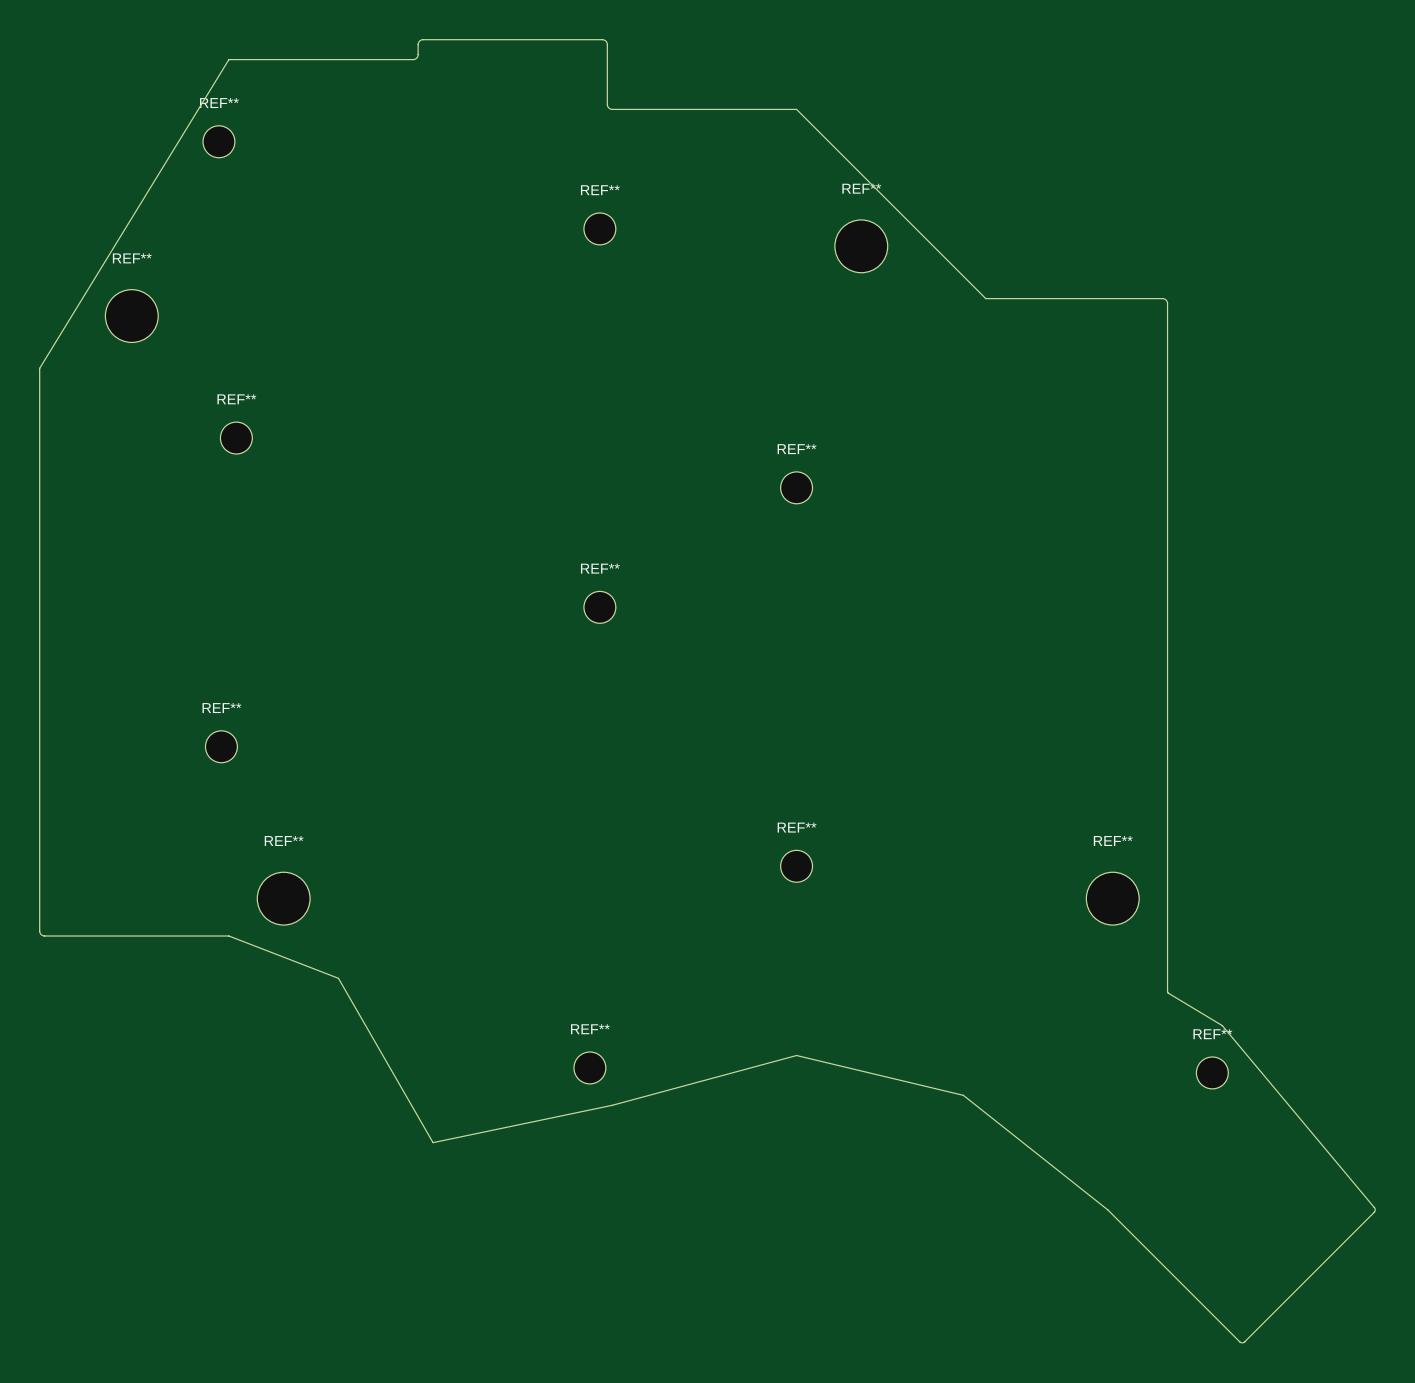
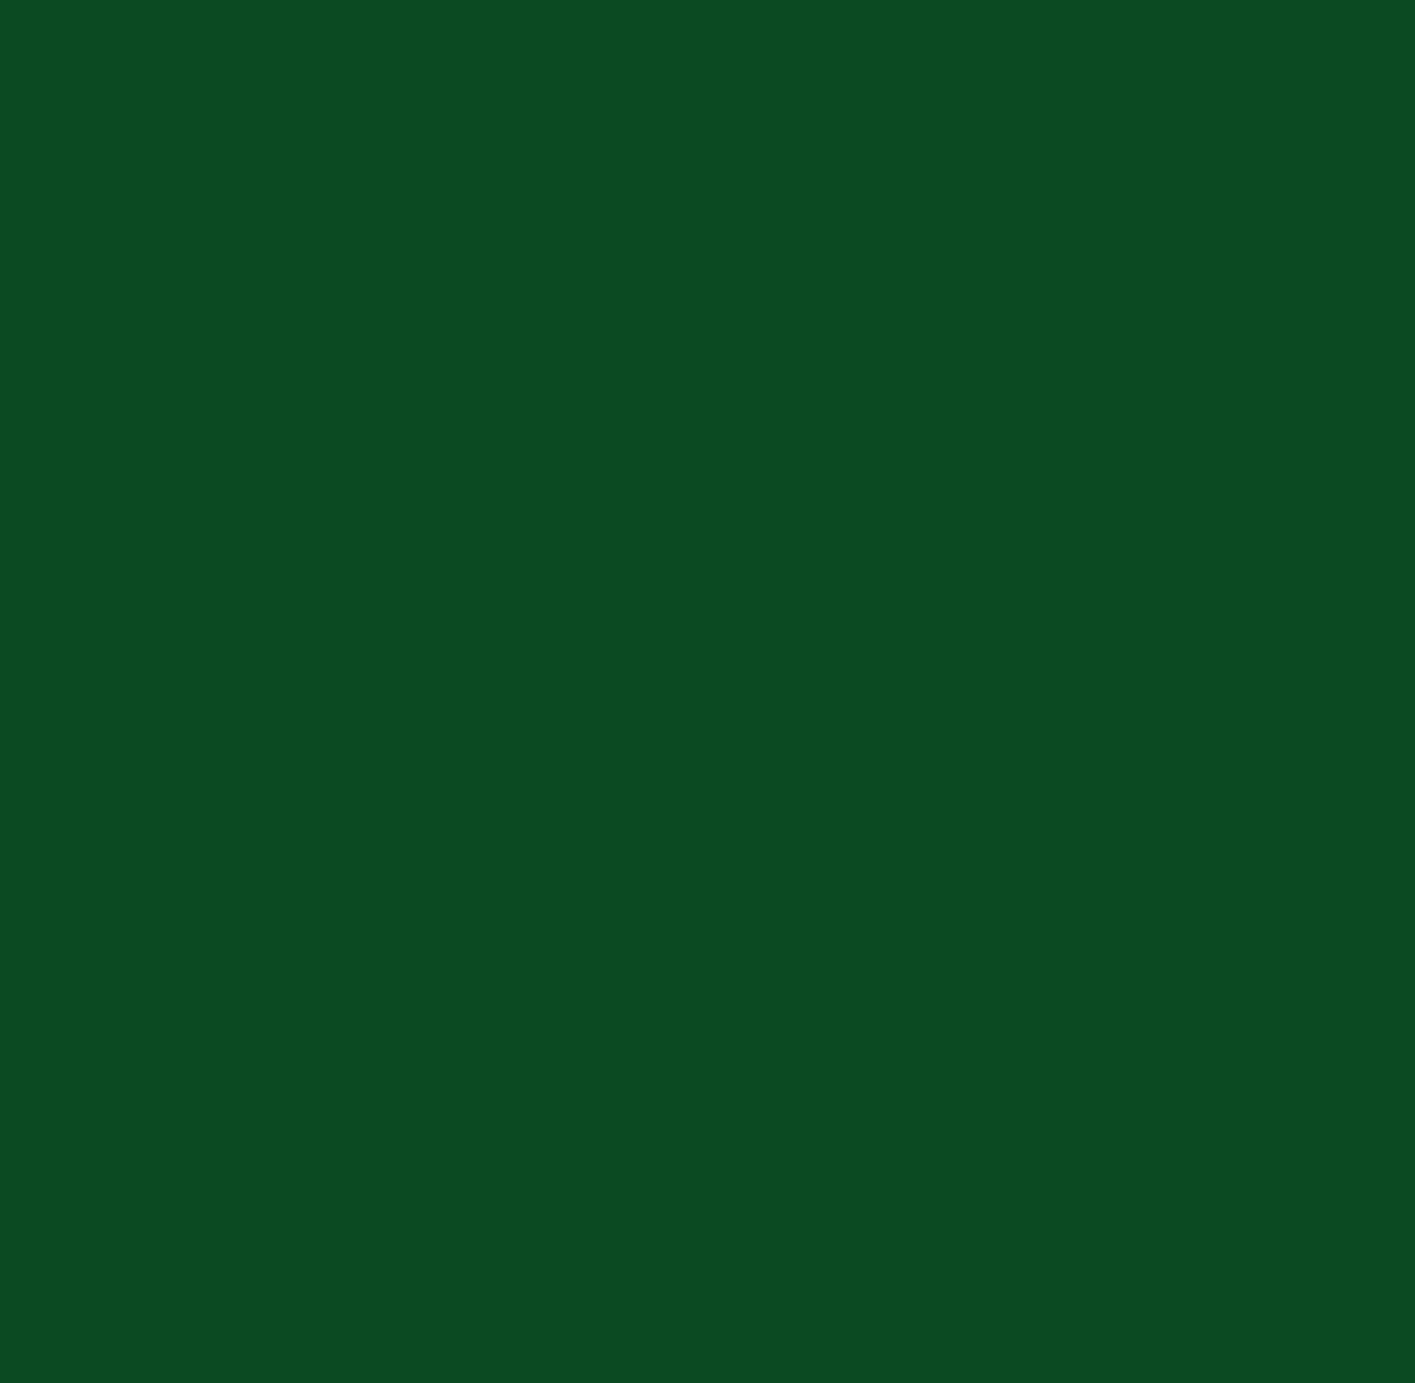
board edge: (423, 39) (604, 40) (607, 44) (607, 104) (609, 108) (796, 109) (985, 298) (1162, 298) (1166, 301) (1167, 991) (1222, 1025) (1375, 1209) (1244, 1342) (1239, 1341) (1107, 1209) (963, 1095) (796, 1055) (612, 1105) (433, 1142) (338, 978) (228, 936) (44, 936) (40, 933) (39, 368) (228, 59) (413, 59) (417, 55) (418, 42) (423, 39) -> none
REF**: (218, 141) -> none
REF**: (599, 228) -> none
REF**: (861, 246) -> none
REF**: (131, 316) -> none
REF**: (236, 438) -> none
REF**: (796, 487) -> none
REF**: (599, 607) -> none
REF**: (221, 746) -> none
REF**: (796, 866) -> none
REF**: (283, 898) -> none
REF**: (1112, 898) -> none
REF**: (589, 1067) -> none
REF**: (1212, 1072) -> none

